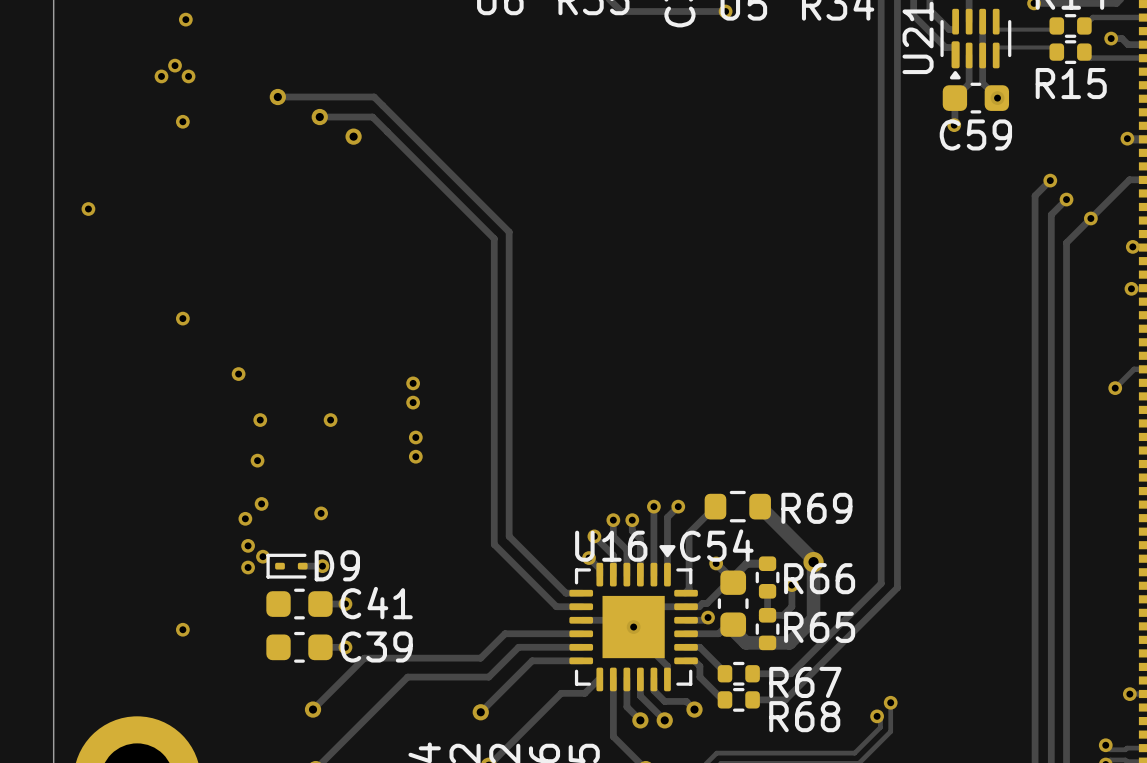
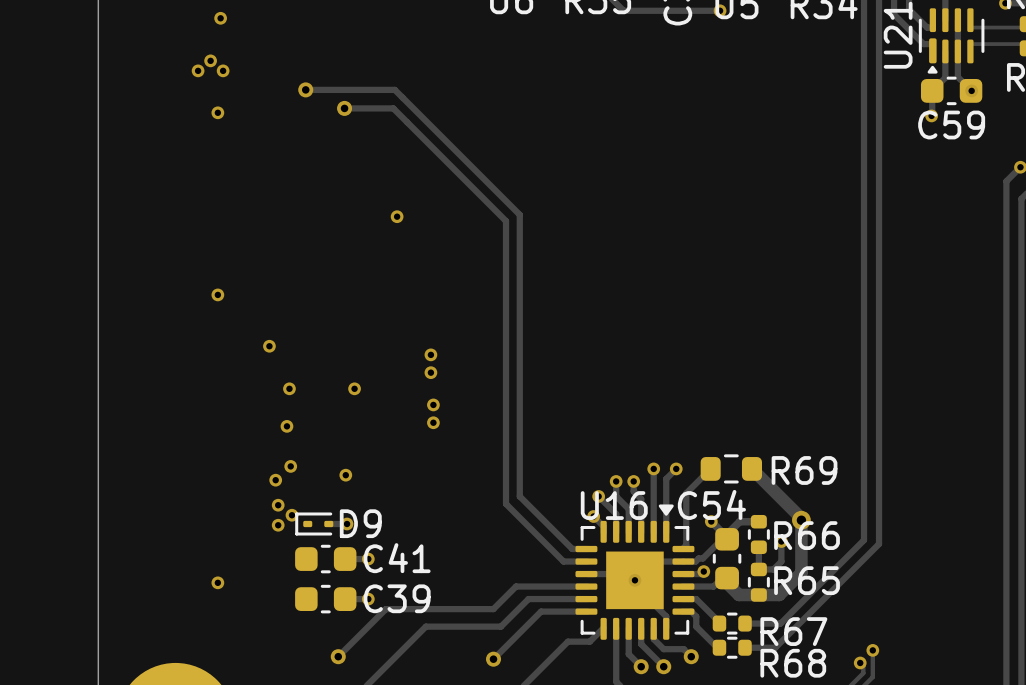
via: (353, 136) -> none
via: (88, 209) -> none
via: none -> (397, 216)

